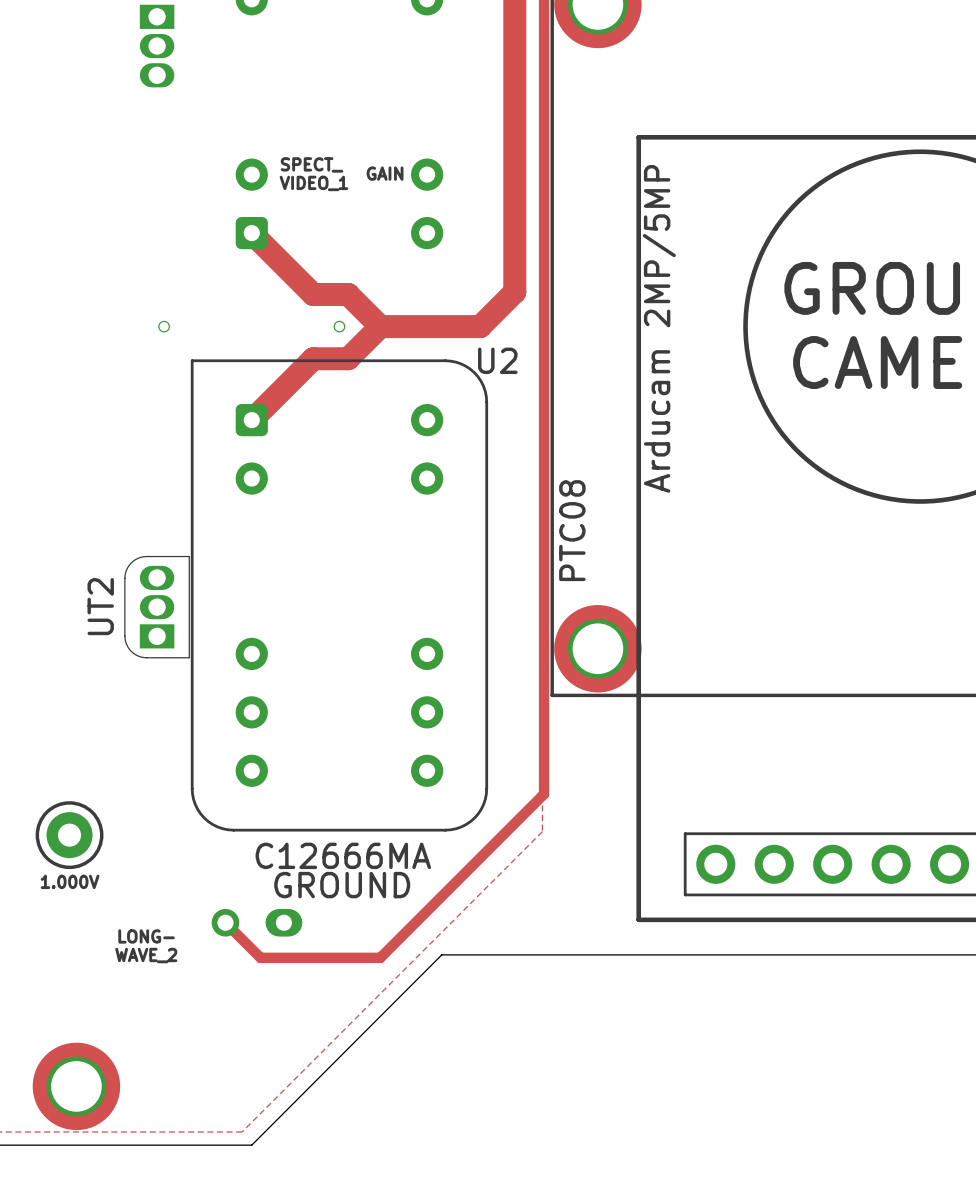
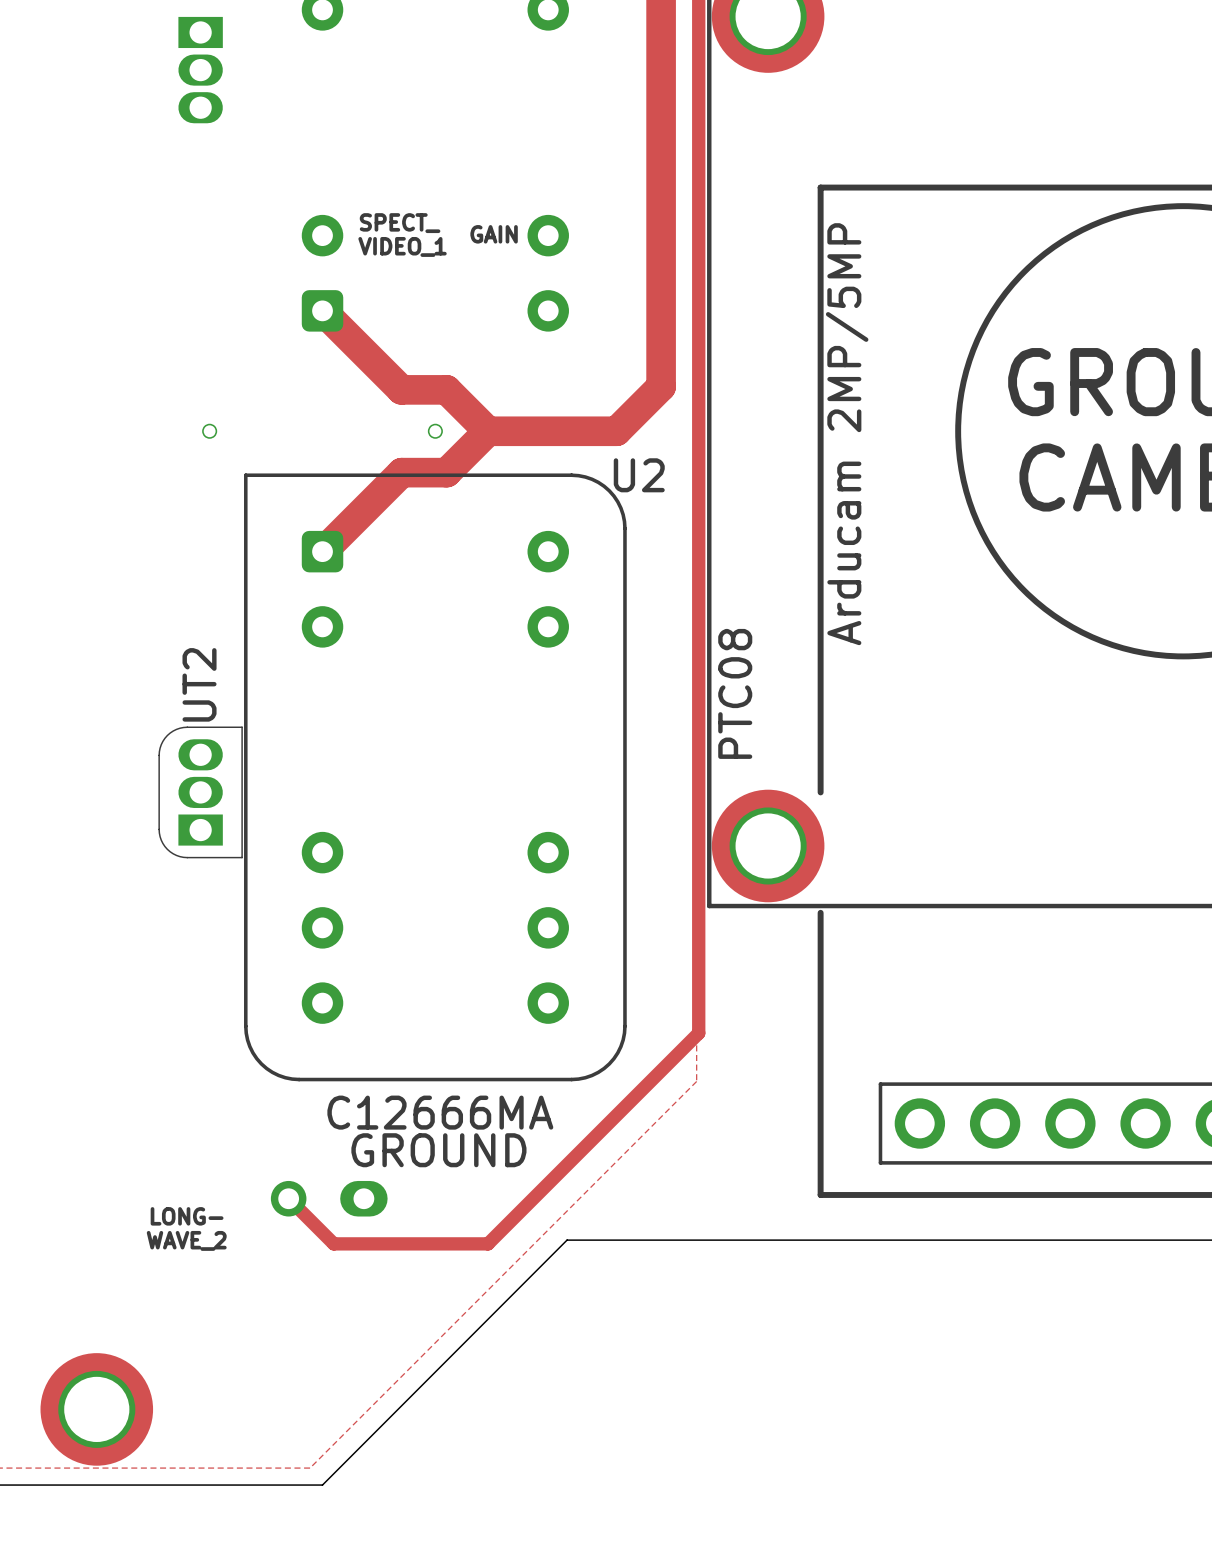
UT2 name position: UT2 (100, 606) -> UT2 (199, 684)
line: (638, 607) (638, 700) -> none
part: (69, 835) -> none
text: 1.000V (70, 881) -> none

